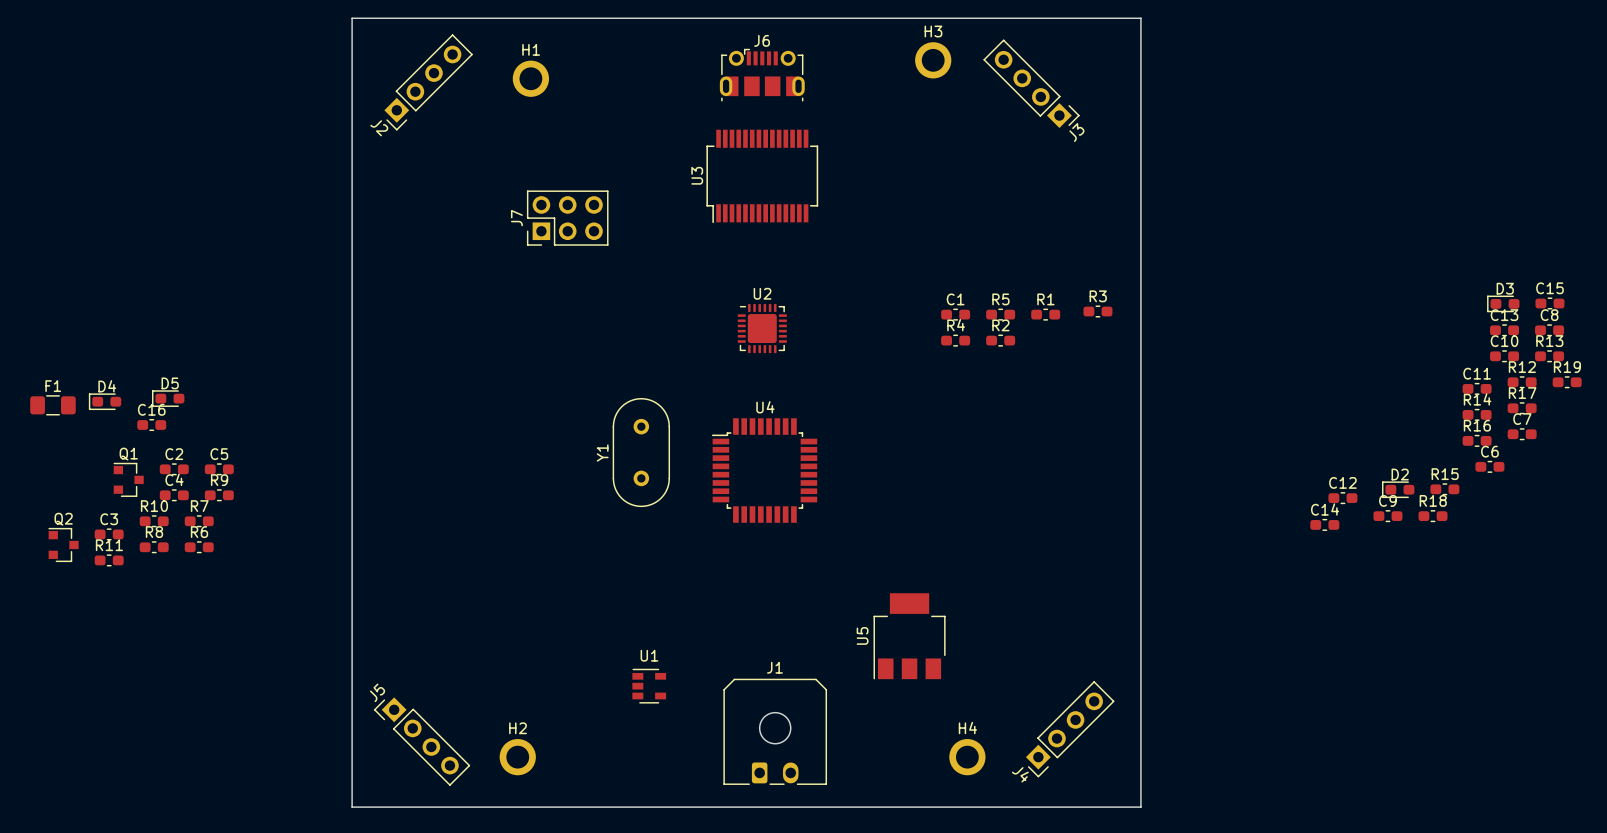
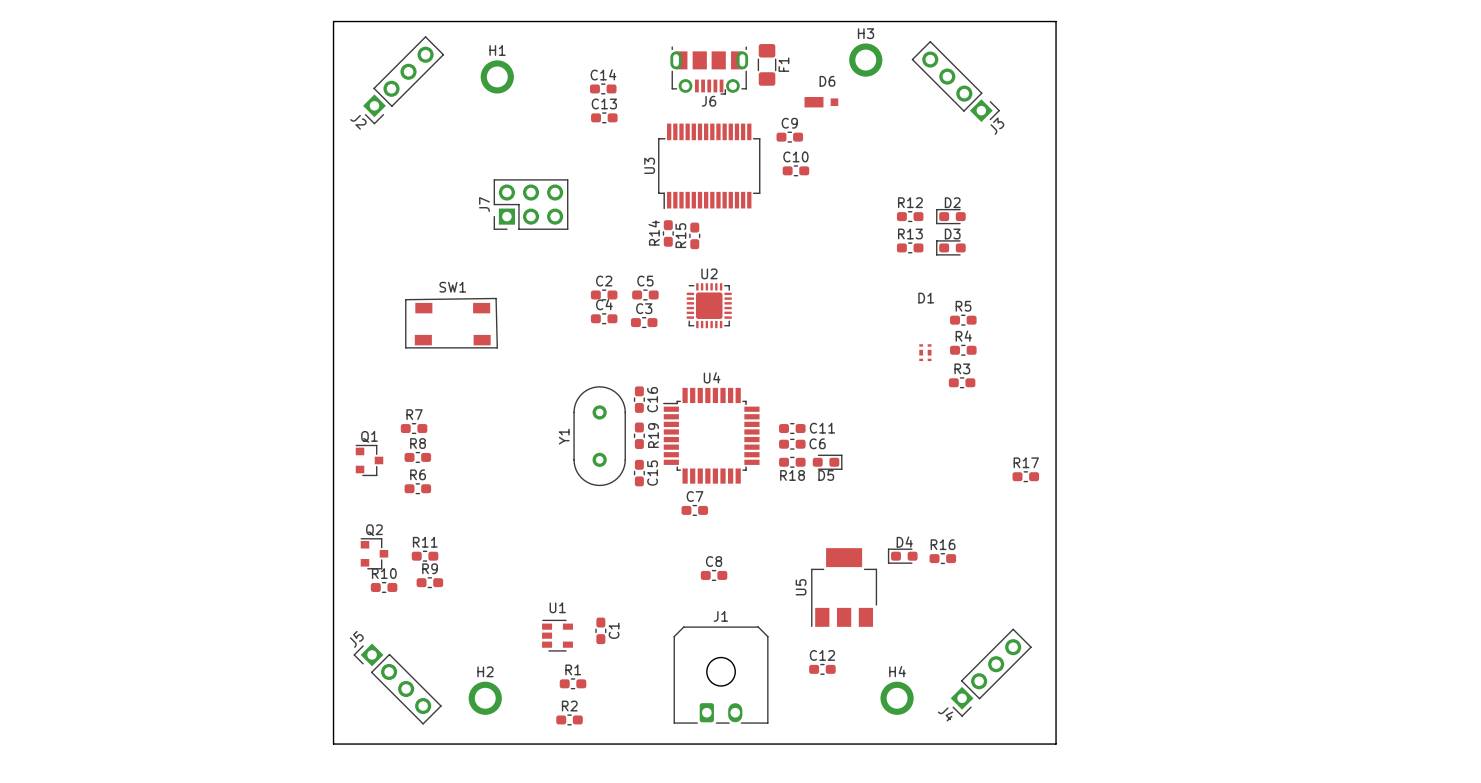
J6 rotation: 0° (762, 75) -> 180° (709, 70)
D6: none -> (821, 102)
D3 position: (1503, 303) -> (950, 247)
C15 rotation: 0° (1549, 303) -> 90° clockwise (639, 473)
C15 position: (1549, 303) -> (639, 473)
R3 position: (1097, 311) -> (962, 382)
C1 rotation: 0° (955, 314) -> 90° clockwise (600, 630)
C1 position: (955, 314) -> (600, 630)
R5 position: (1000, 314) -> (963, 320)
R1 position: (1045, 314) -> (573, 683)
C13 position: (1504, 330) -> (604, 117)
C8 position: (1549, 330) -> (714, 575)
R4 position: (955, 340) -> (963, 350)
R2 position: (1000, 340) -> (569, 719)
SW1: none -> (451, 323)
C10 position: (1504, 356) -> (795, 170)
R13 position: (1549, 356) -> (910, 247)
C11 name position: C11 (1477, 373) -> C11 (822, 428)
D1: none -> (925, 352)
R12 position: (1522, 382) -> (910, 216)
R19 rotation: 0° (1567, 382) -> 90° clockwise (639, 435)
R19 position: (1567, 382) -> (639, 435)
C11 position: (1477, 388) -> (792, 428)
D5 rotation: 0° (168, 398) -> 180° (827, 462)
D5 position: (168, 398) -> (827, 462)
R14 name position: R14 (1477, 399) -> R14 (654, 233)
D4 position: (105, 401) -> (902, 556)
F1 rotation: 0° (52, 405) -> 90° clockwise (767, 64)
F1 position: (52, 405) -> (767, 64)
R17 position: (1522, 408) -> (1025, 476)
R14 rotation: 0° (1477, 414) -> 90° clockwise (668, 233)
R14 position: (1477, 414) -> (668, 233)
C16 rotation: 0° (151, 425) -> 90° clockwise (639, 399)
C16 position: (151, 425) -> (639, 399)
C7 position: (1522, 434) -> (694, 510)
R16 position: (1477, 440) -> (942, 558)
C6 name position: C6 (1489, 451) -> C6 (817, 443)
Y1 position: (641, 452) -> (599, 436)
C6 position: (1489, 466) -> (792, 444)
C2 position: (174, 469) -> (604, 294)
C5 position: (219, 469) -> (645, 294)
R15 name position: R15 (1445, 474) -> R15 (680, 235)
Q1 position: (128, 479) -> (369, 460)
D2 position: (1398, 489) -> (950, 216)
R15 rotation: 0° (1444, 489) -> 90° clockwise (694, 235)
R15 position: (1444, 489) -> (694, 235)
C4 position: (174, 495) -> (604, 318)
R9 position: (219, 495) -> (429, 582)
C12 position: (1342, 498) -> (822, 669)
R18 name position: R18 (1433, 500) -> R18 (792, 475)
C9 position: (1387, 516) -> (789, 137)
R18 position: (1433, 516) -> (792, 462)
R10 position: (154, 521) -> (384, 587)
R7 position: (199, 521) -> (414, 428)
C14 position: (1324, 524) -> (603, 88)
C3 position: (109, 534) -> (644, 322)
Q2 position: (63, 544) -> (374, 553)
R8 position: (154, 547) -> (417, 457)
R6 position: (199, 547) -> (417, 488)
R11 position: (109, 560) -> (425, 556)
U1 position: (649, 686) -> (557, 635)

